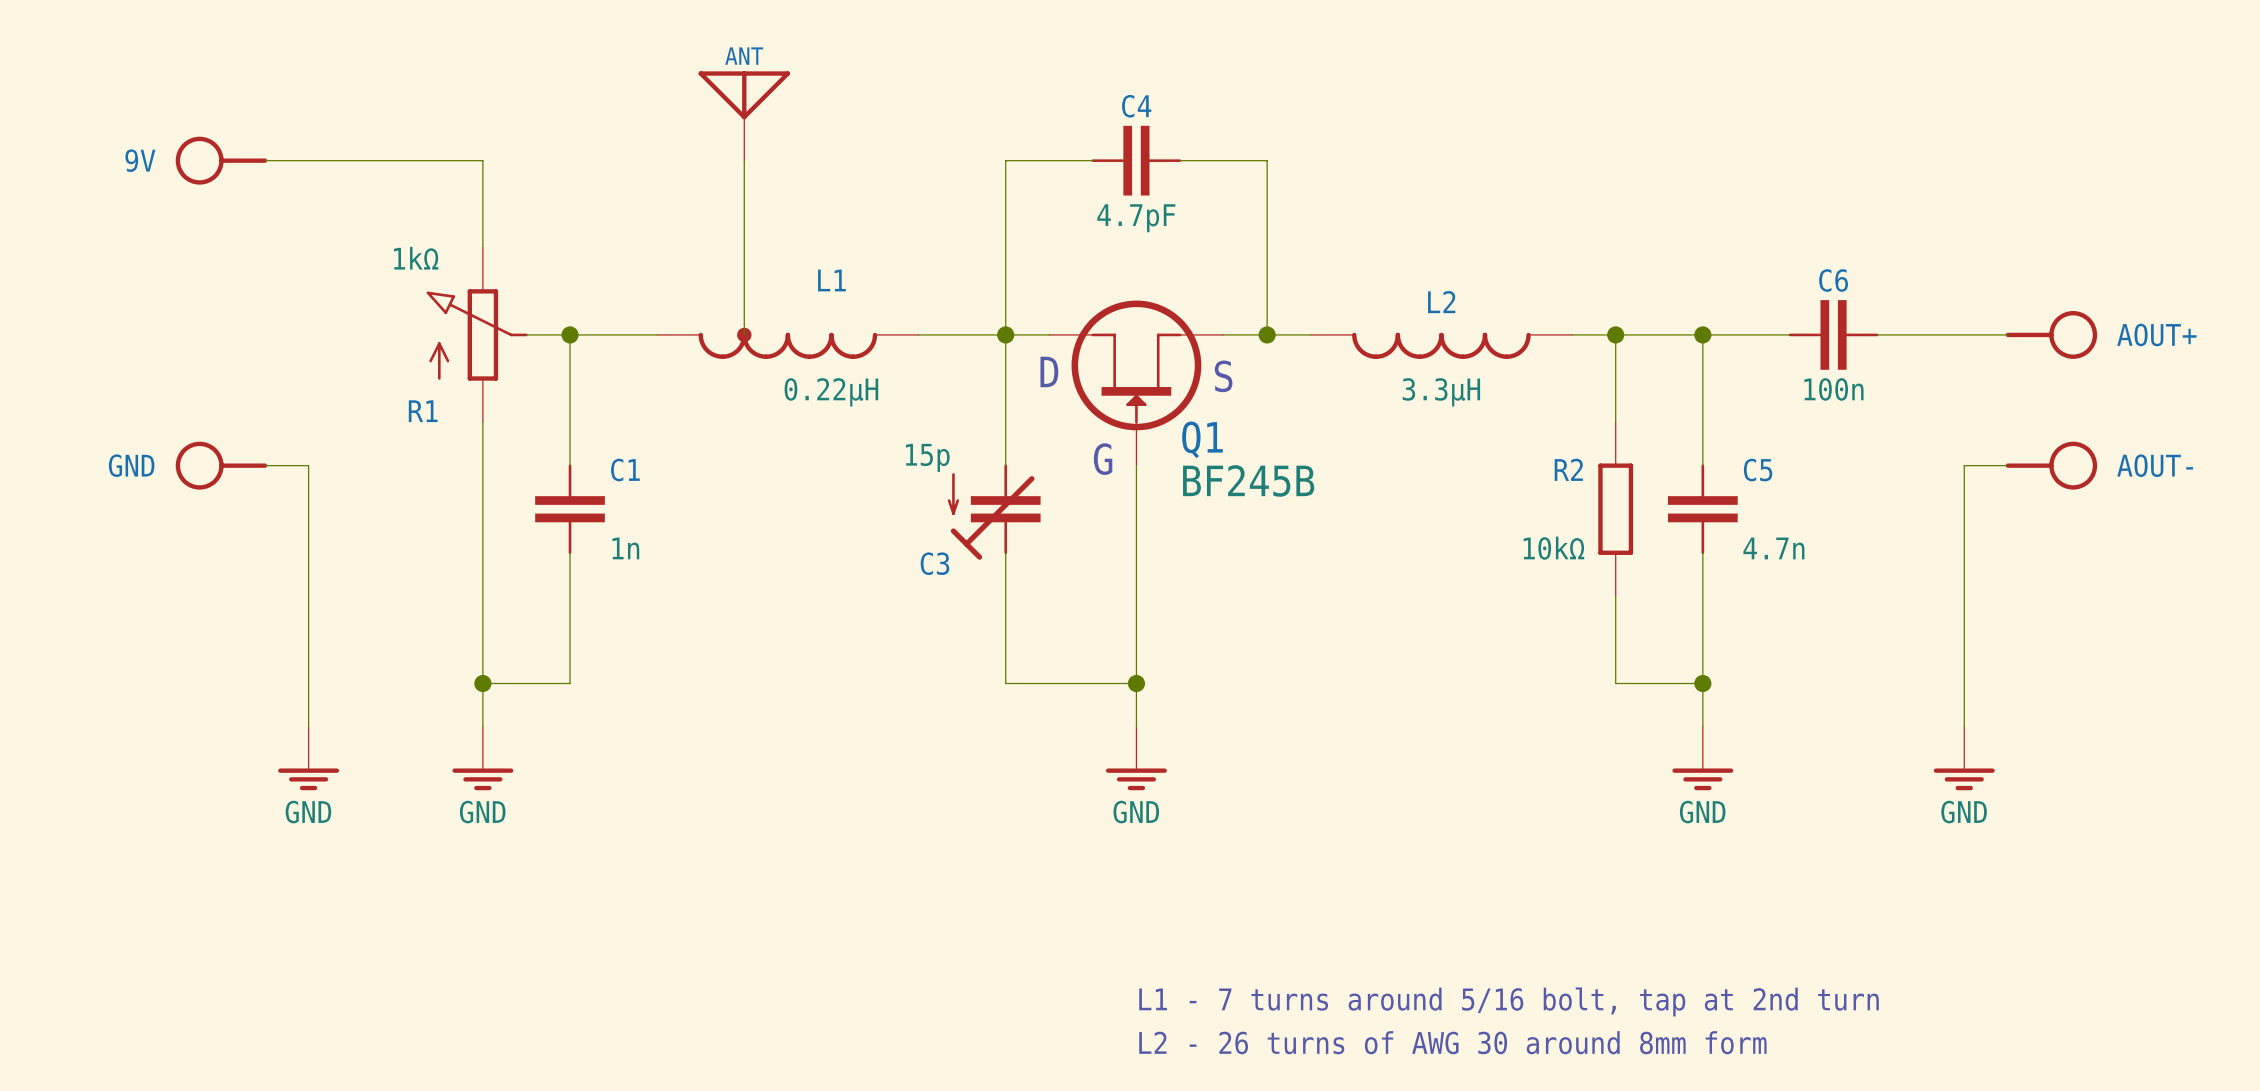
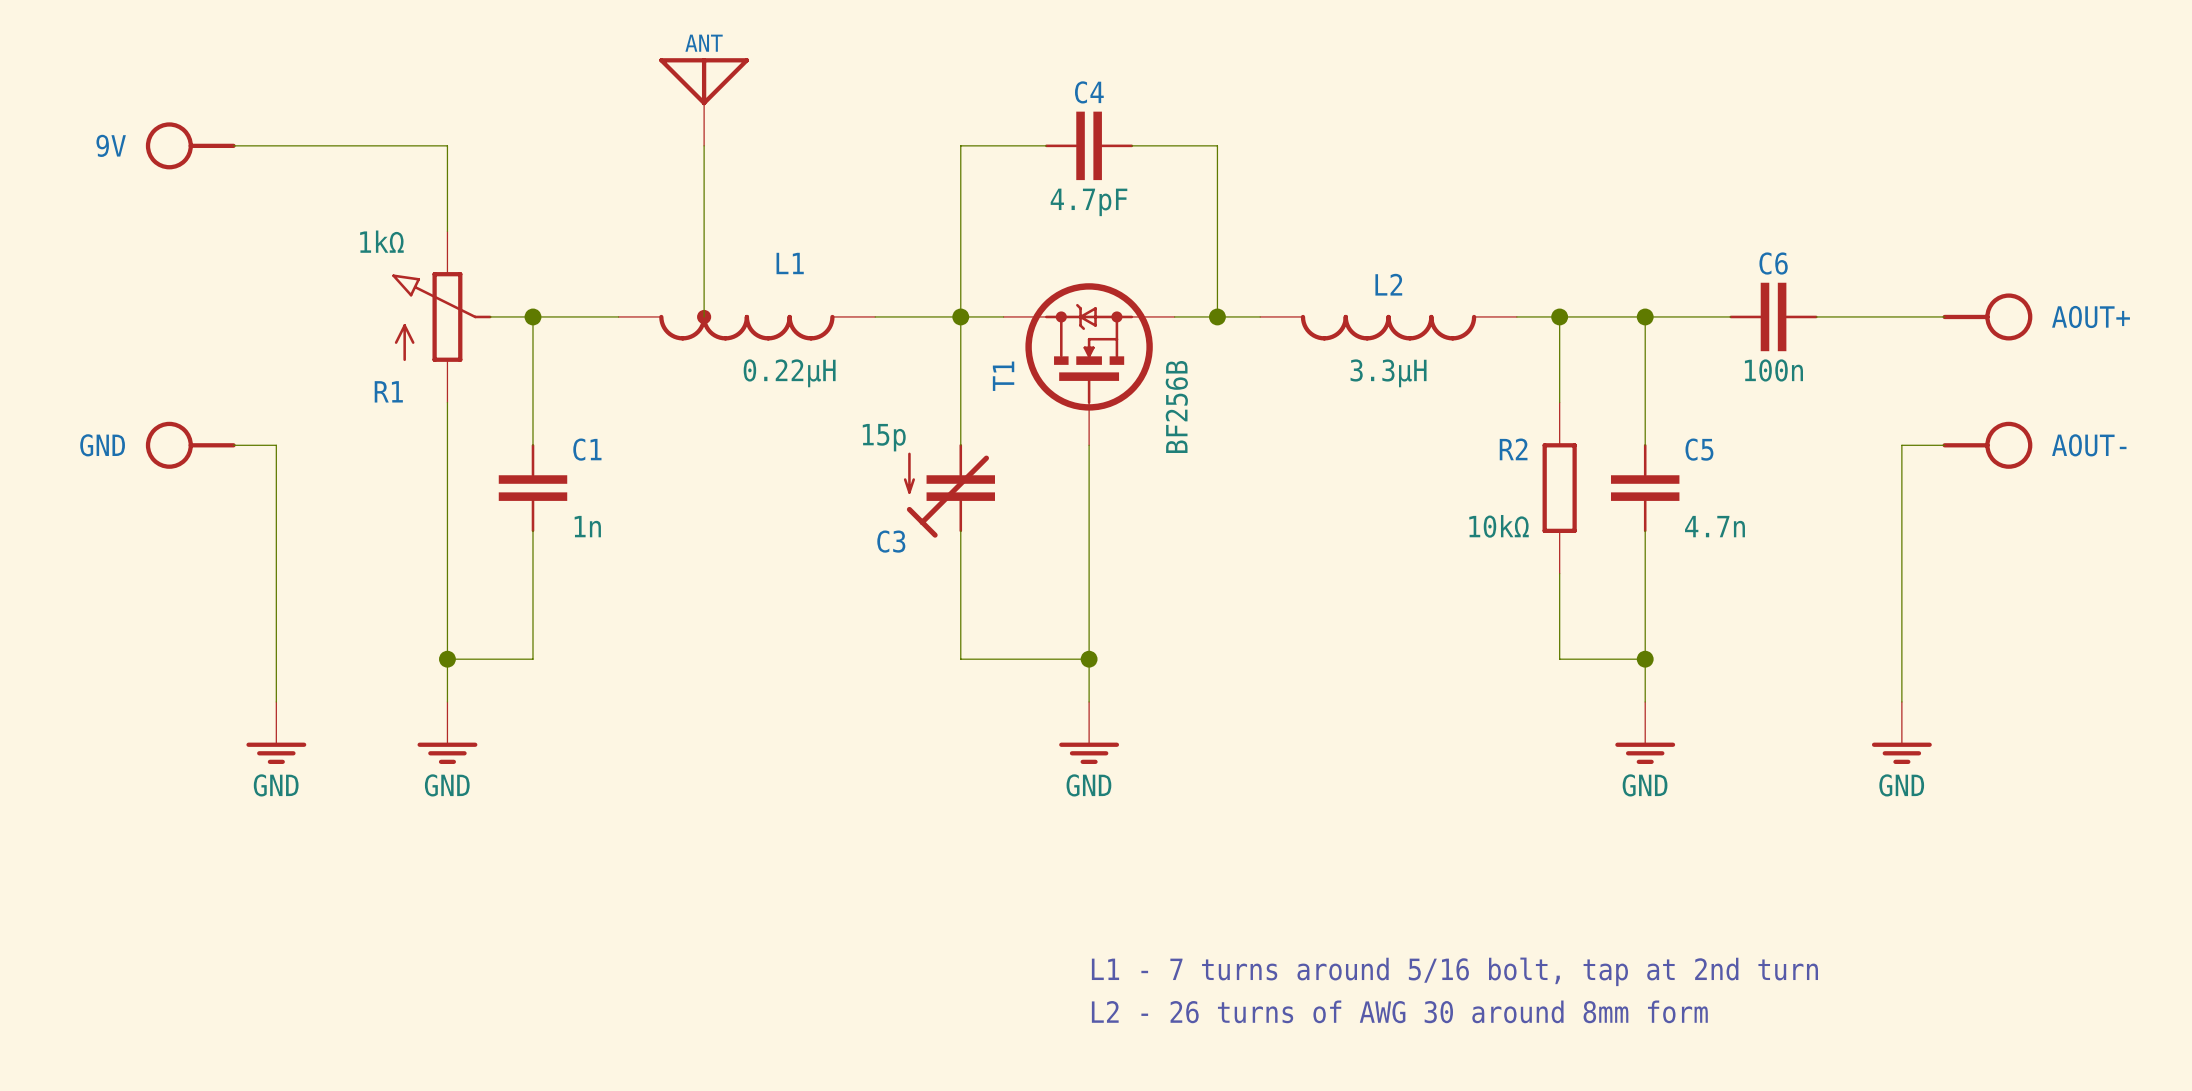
Q1: BF245B (1136, 383) -> none
T1: none -> BF256B (1089, 364)

